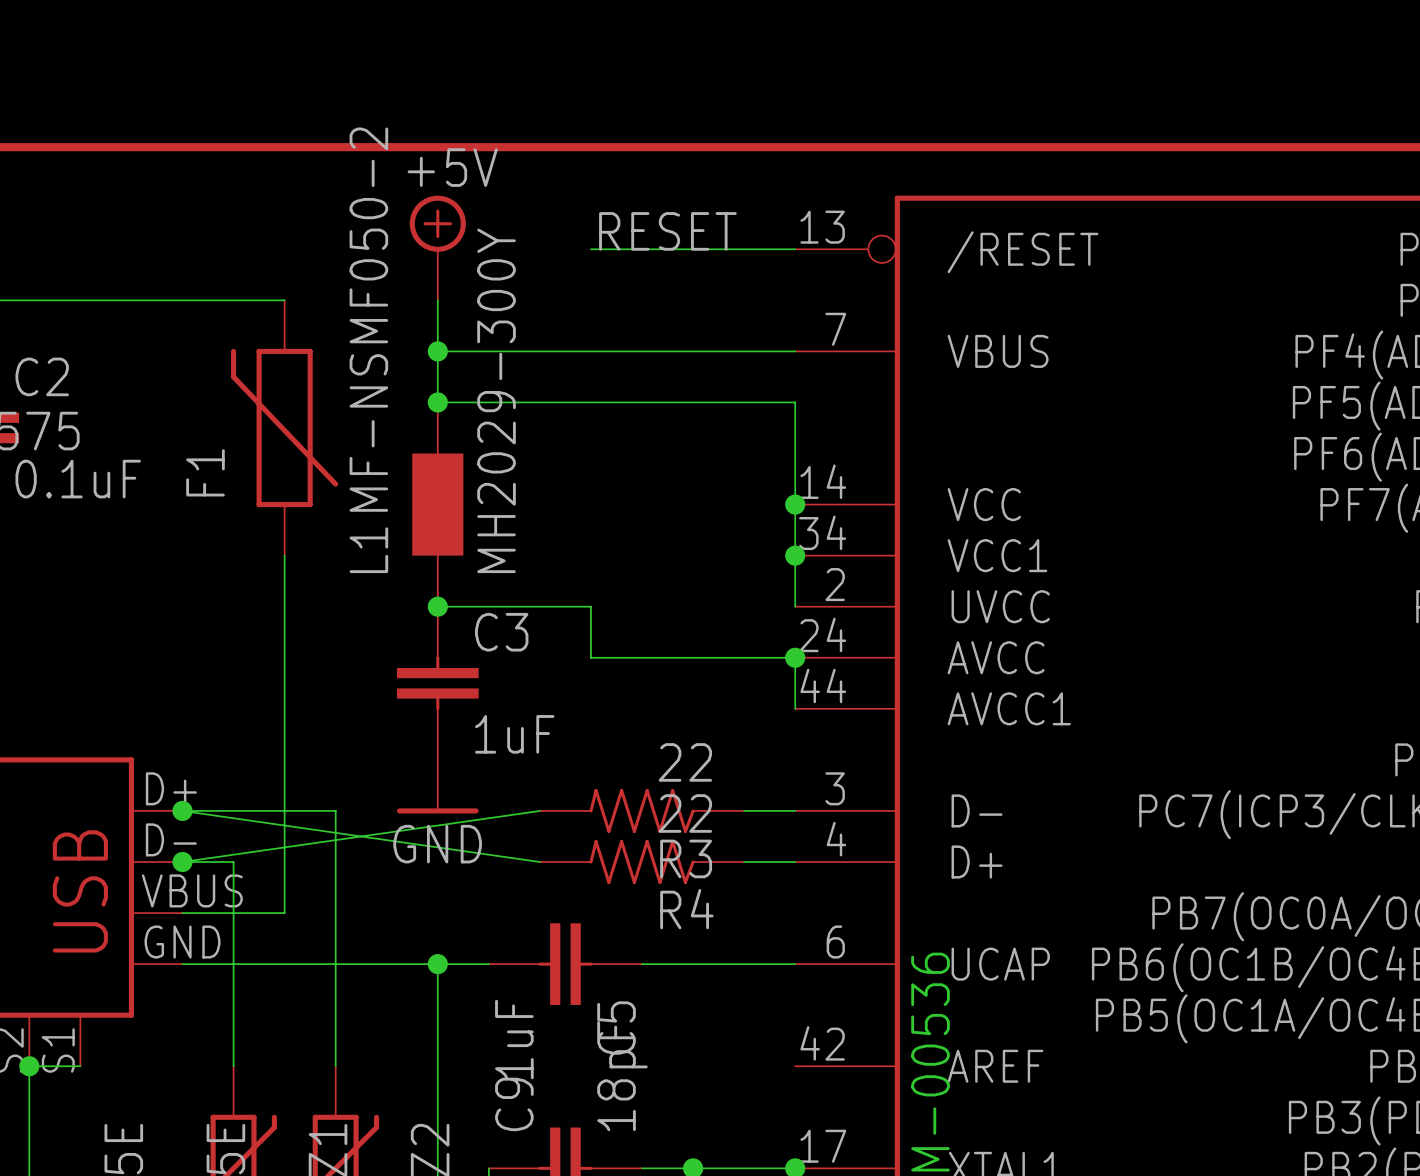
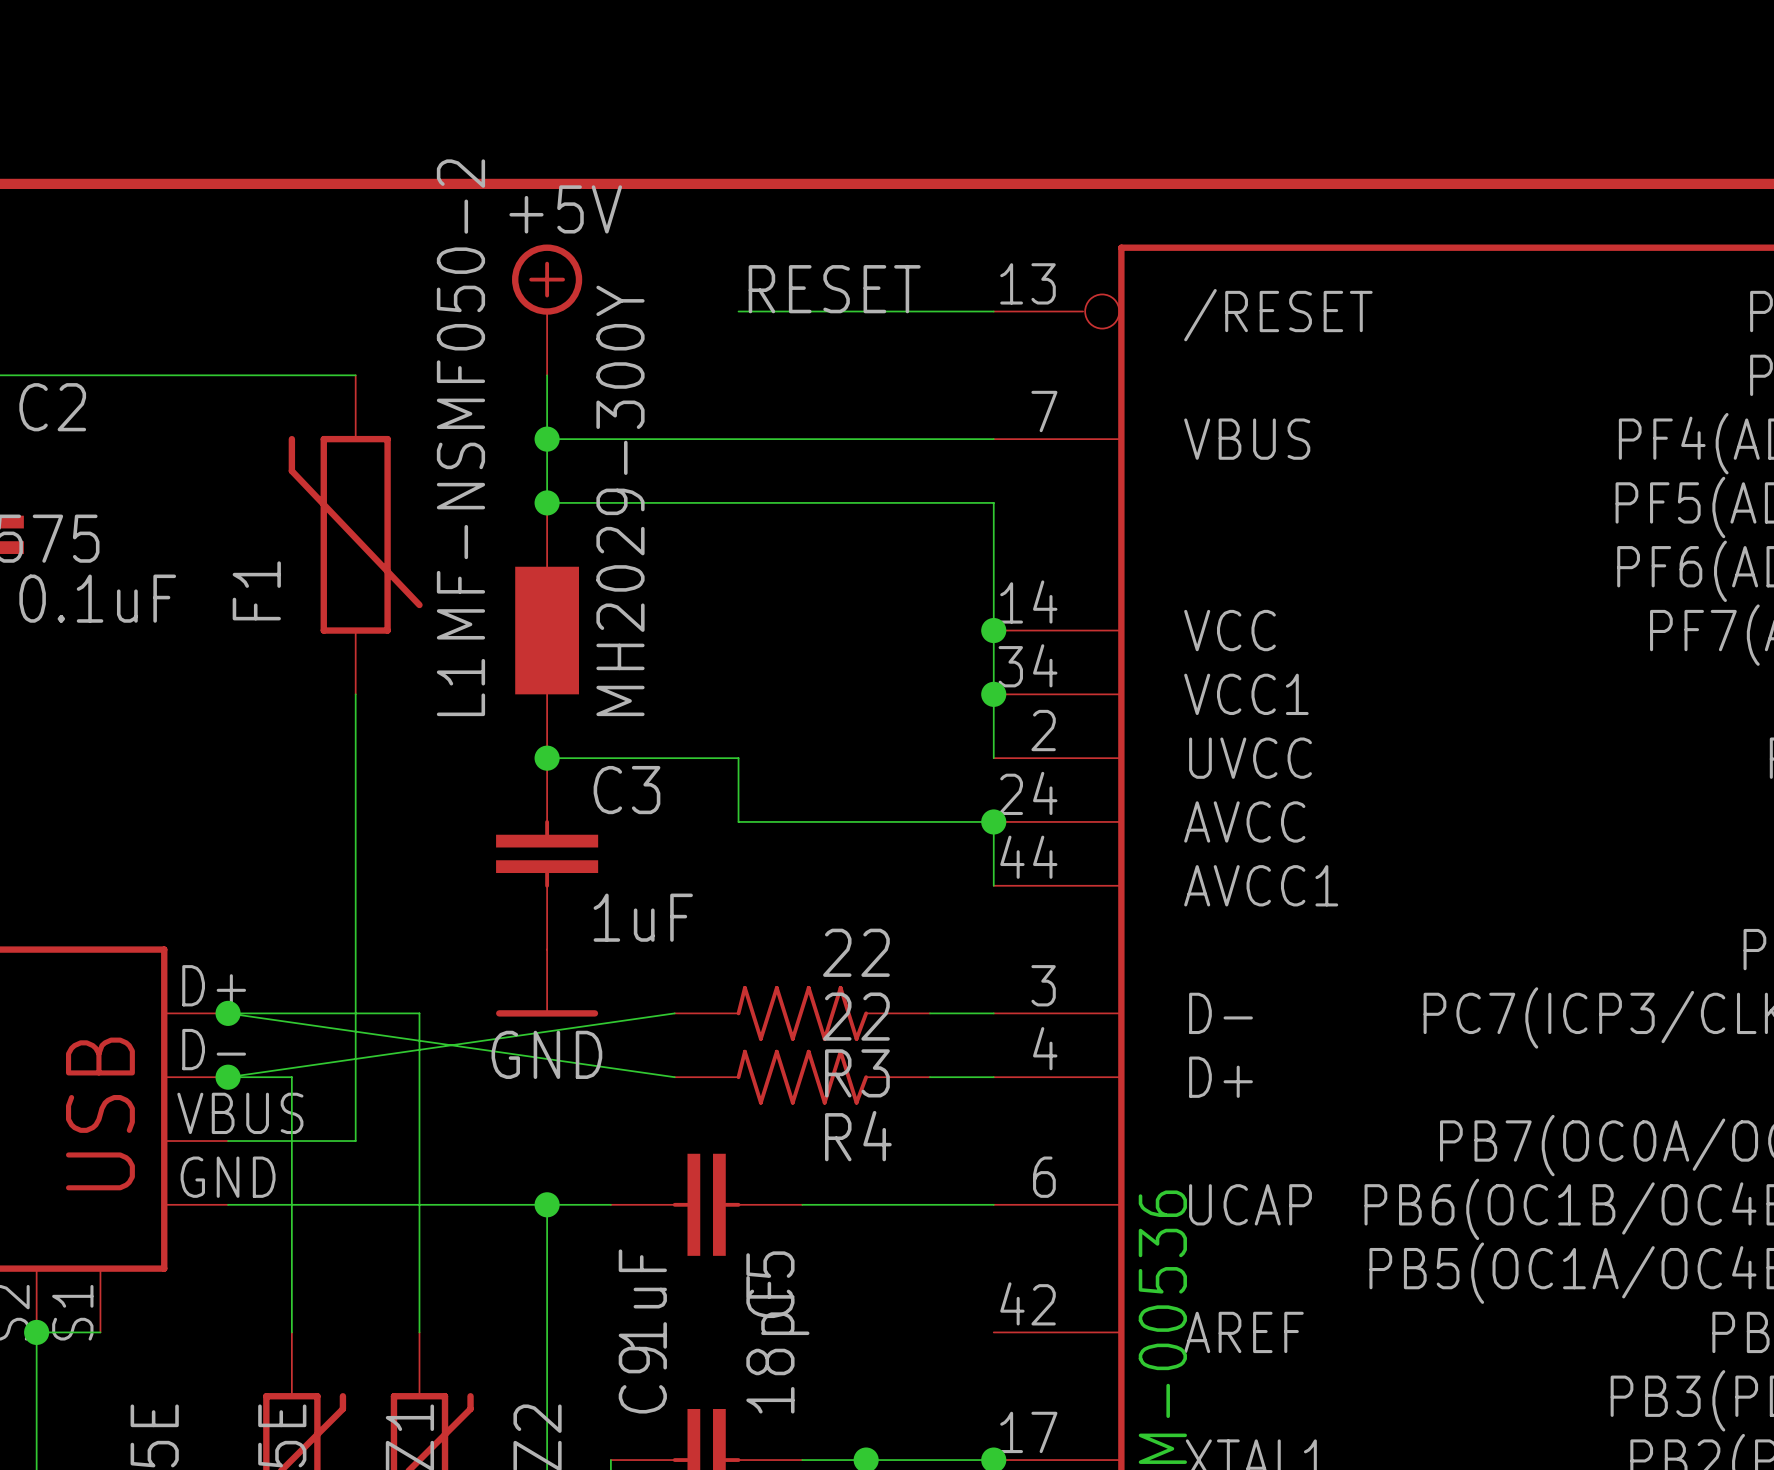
C2 name position: C2 (42, 376) -> C2 (52, 407)

